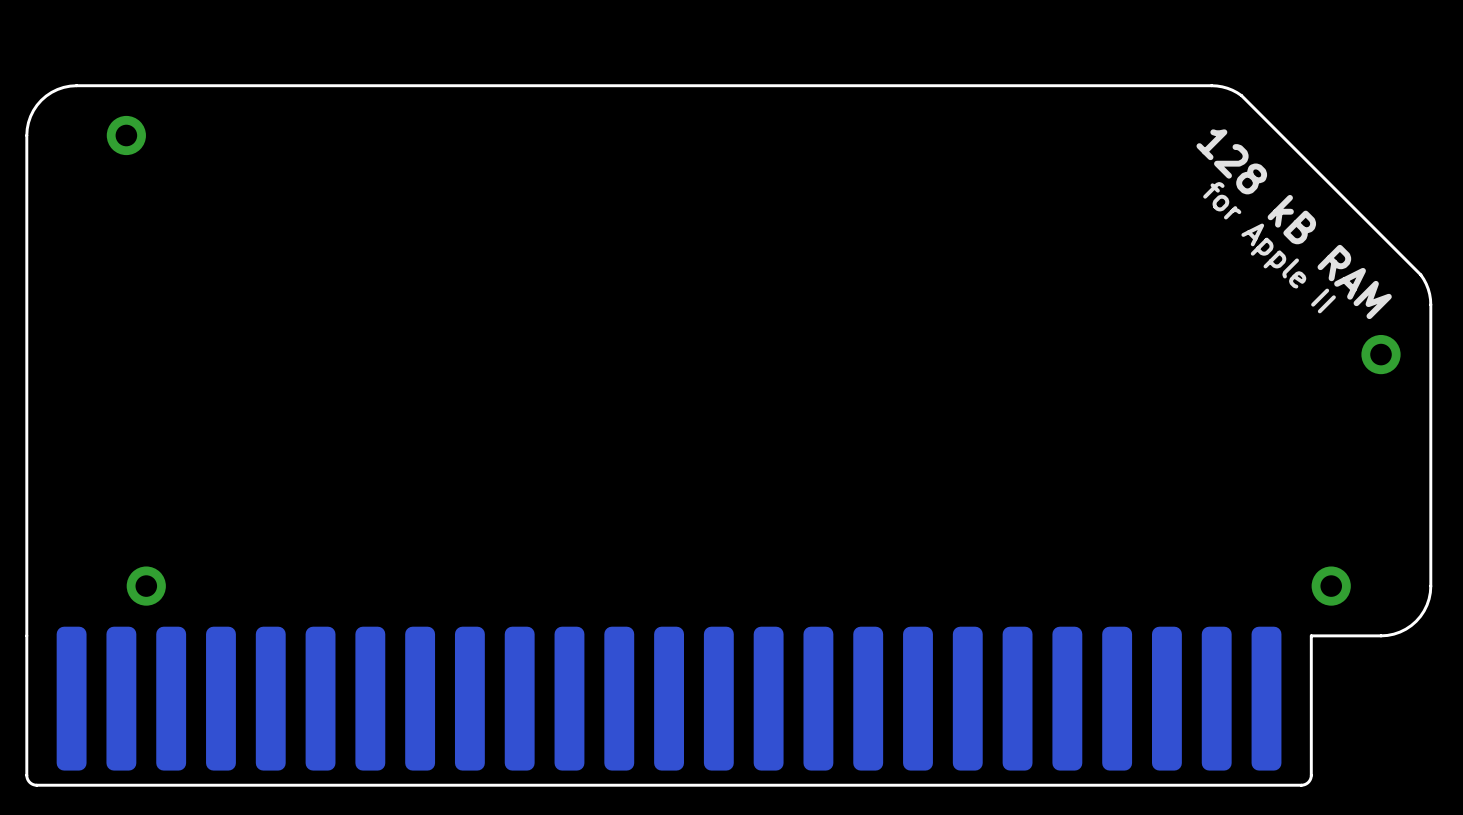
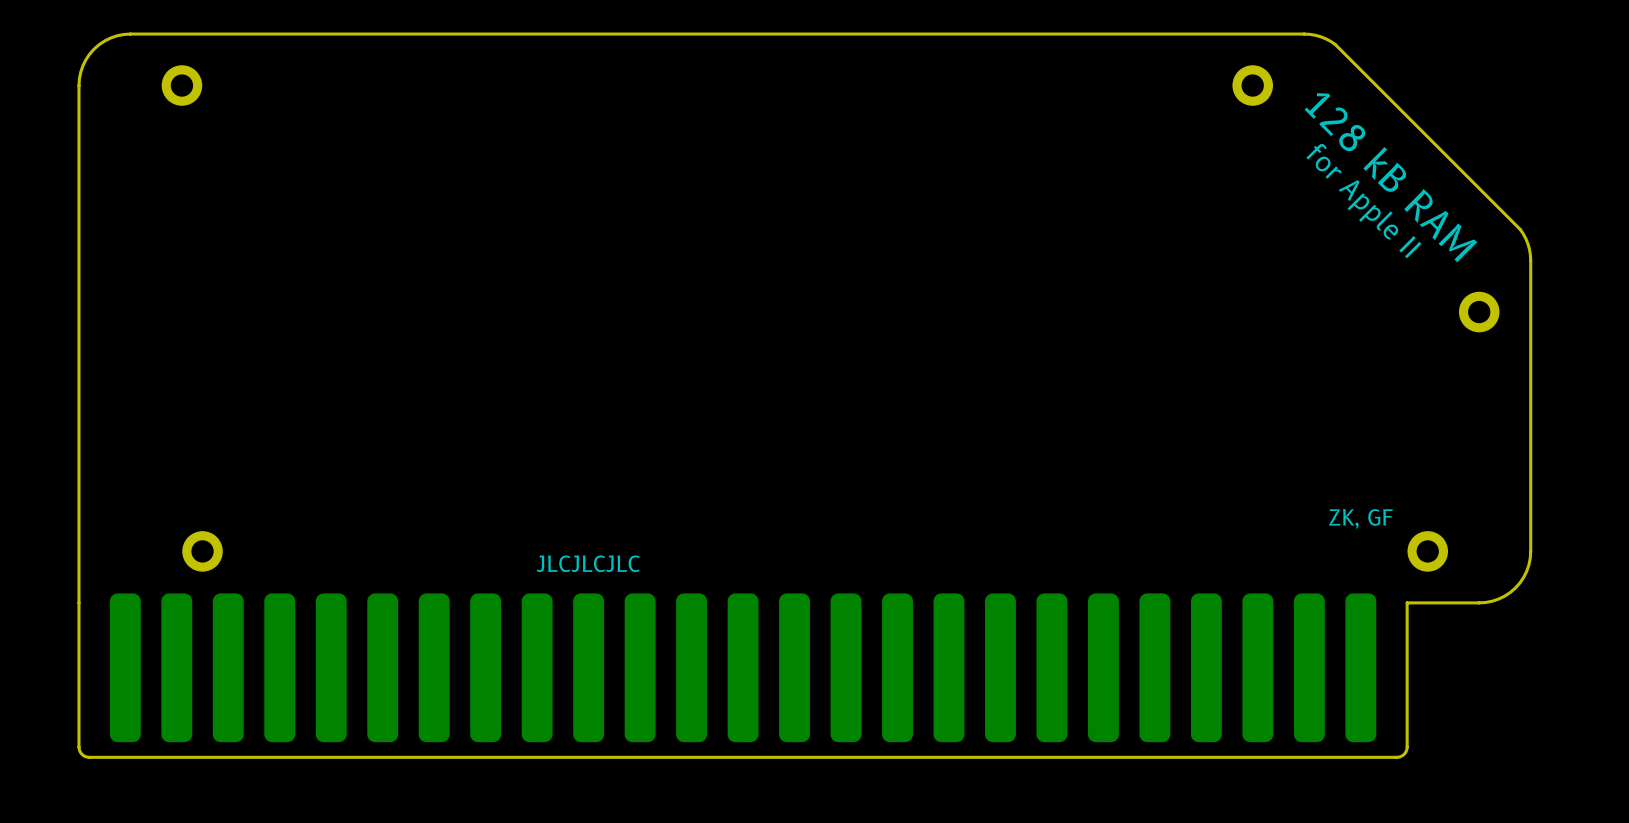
part: none -> (1252, 85)
text: none -> ZK, GF (1360, 518)
text: none -> JLCJLCJLC (588, 563)

